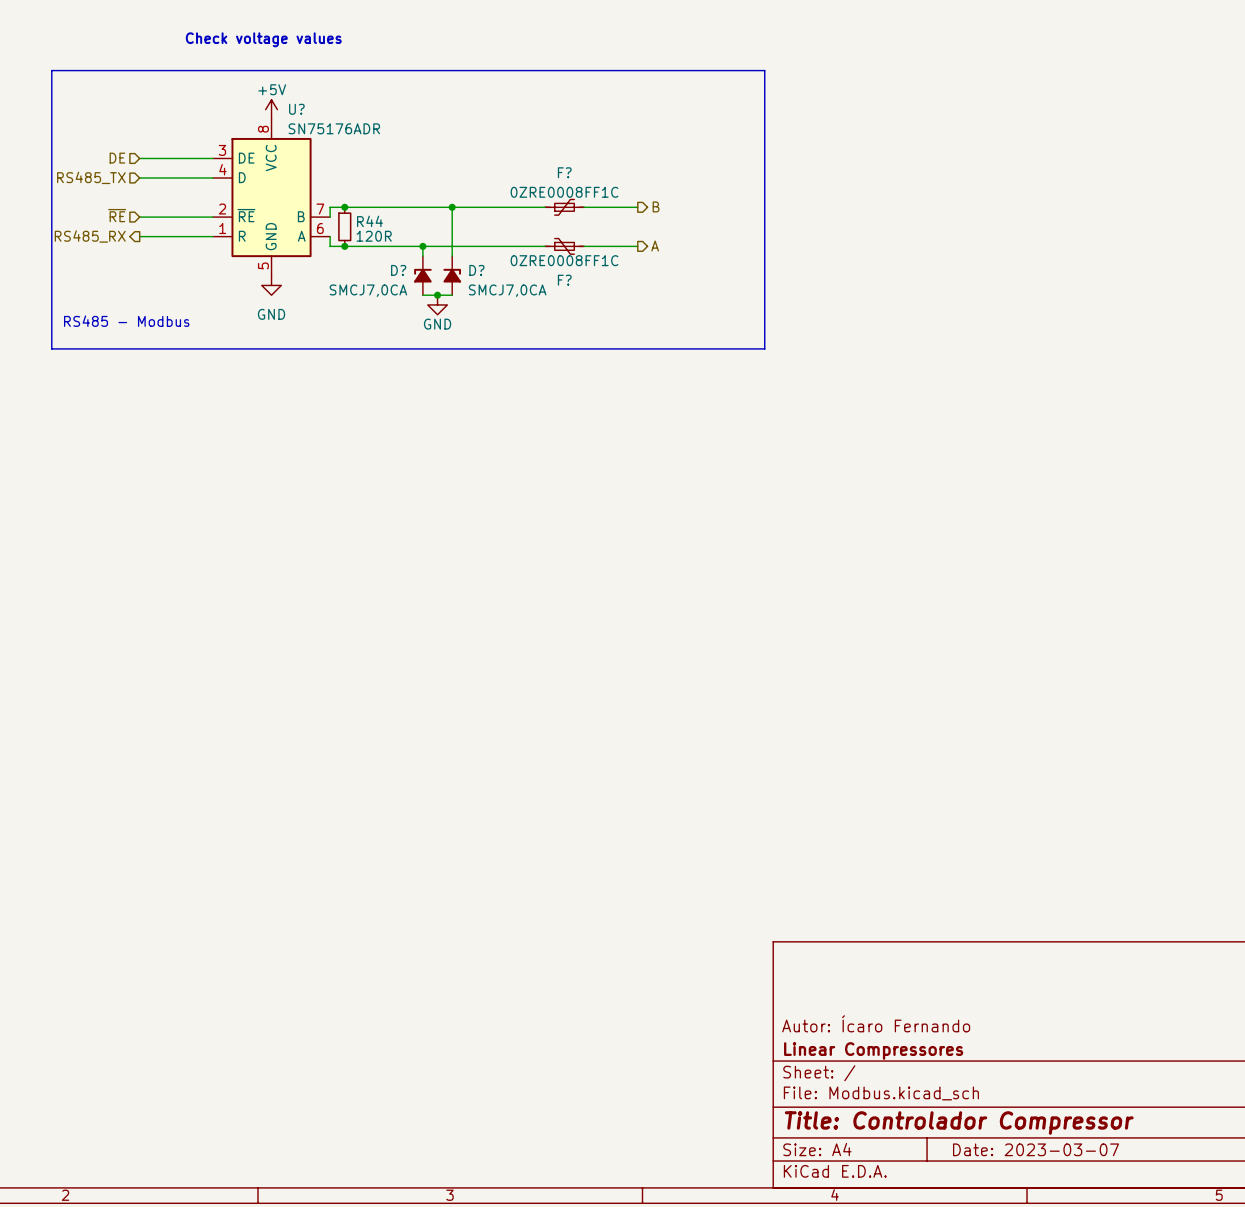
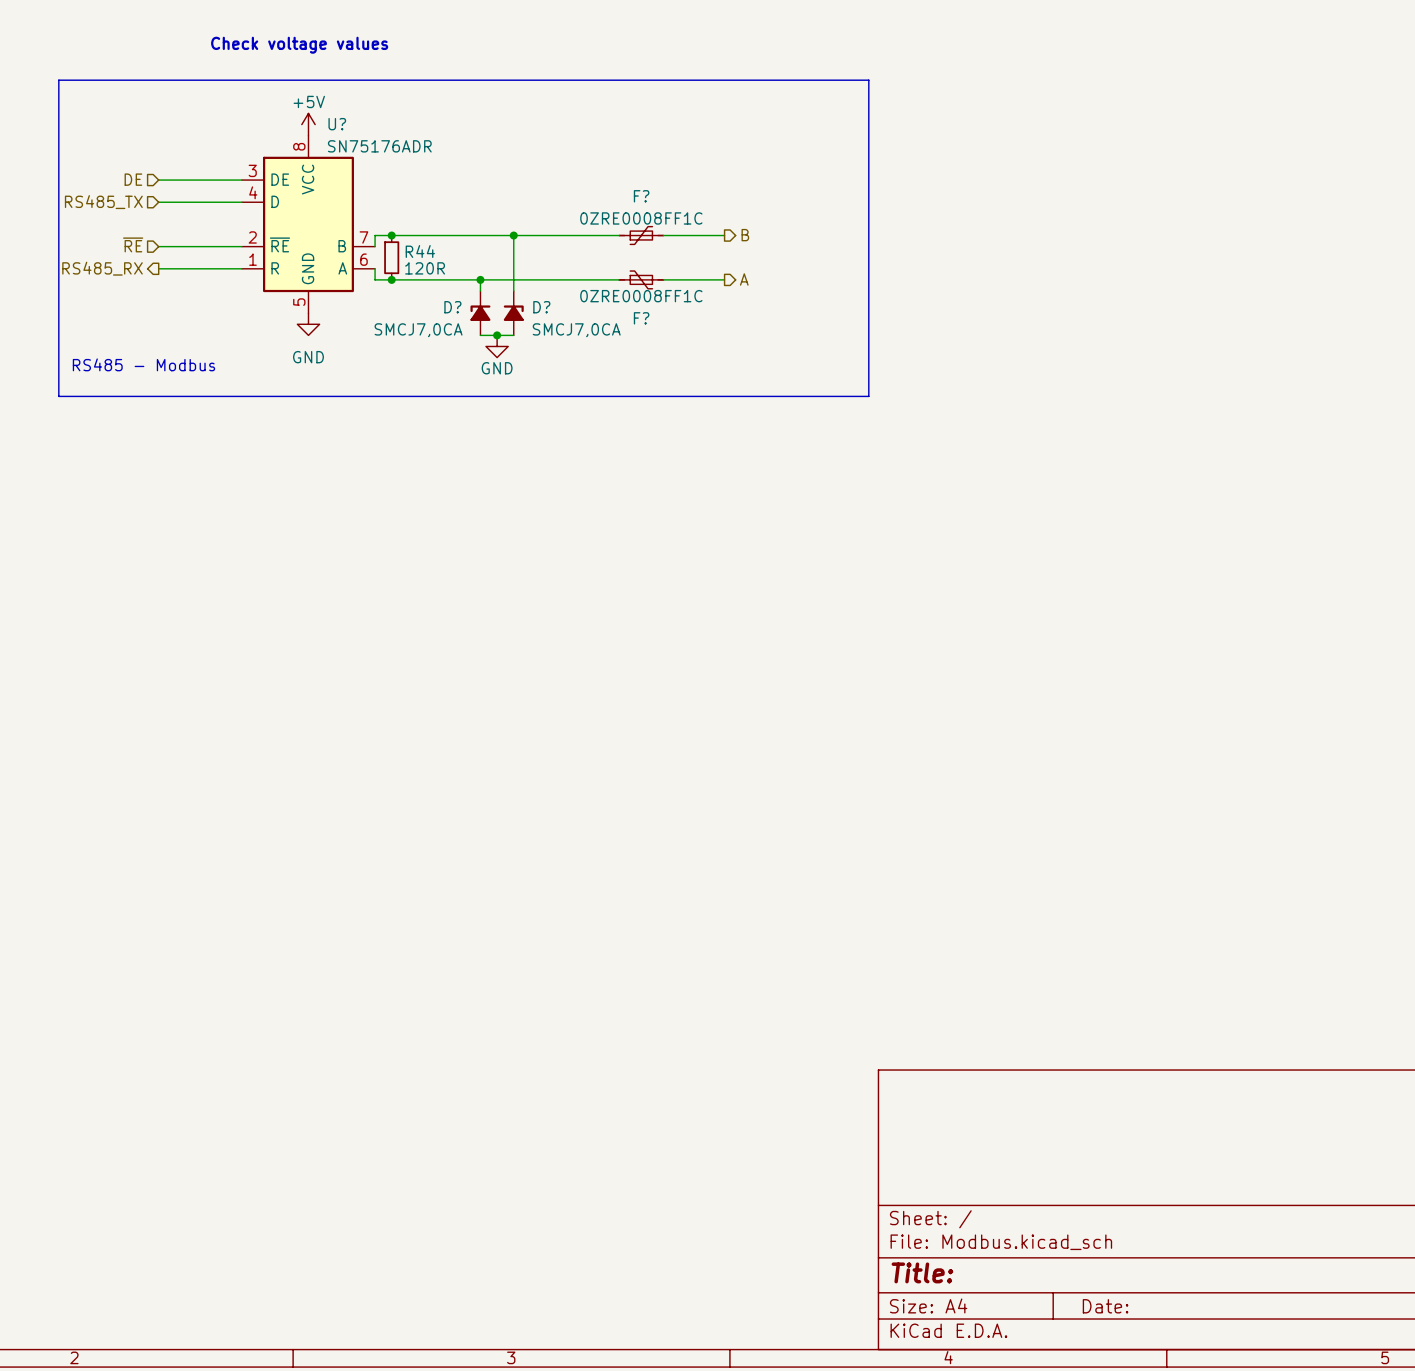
title block: Autor: Ícaro Fernando (876, 1023) -> none
title block: Linear Compressores (873, 1050) -> none
title block: Title: Controlador Compressor (959, 1123) -> Title: (922, 1272)
title block: Date: 2023-03-07 (1036, 1149) -> Date: (1105, 1306)

